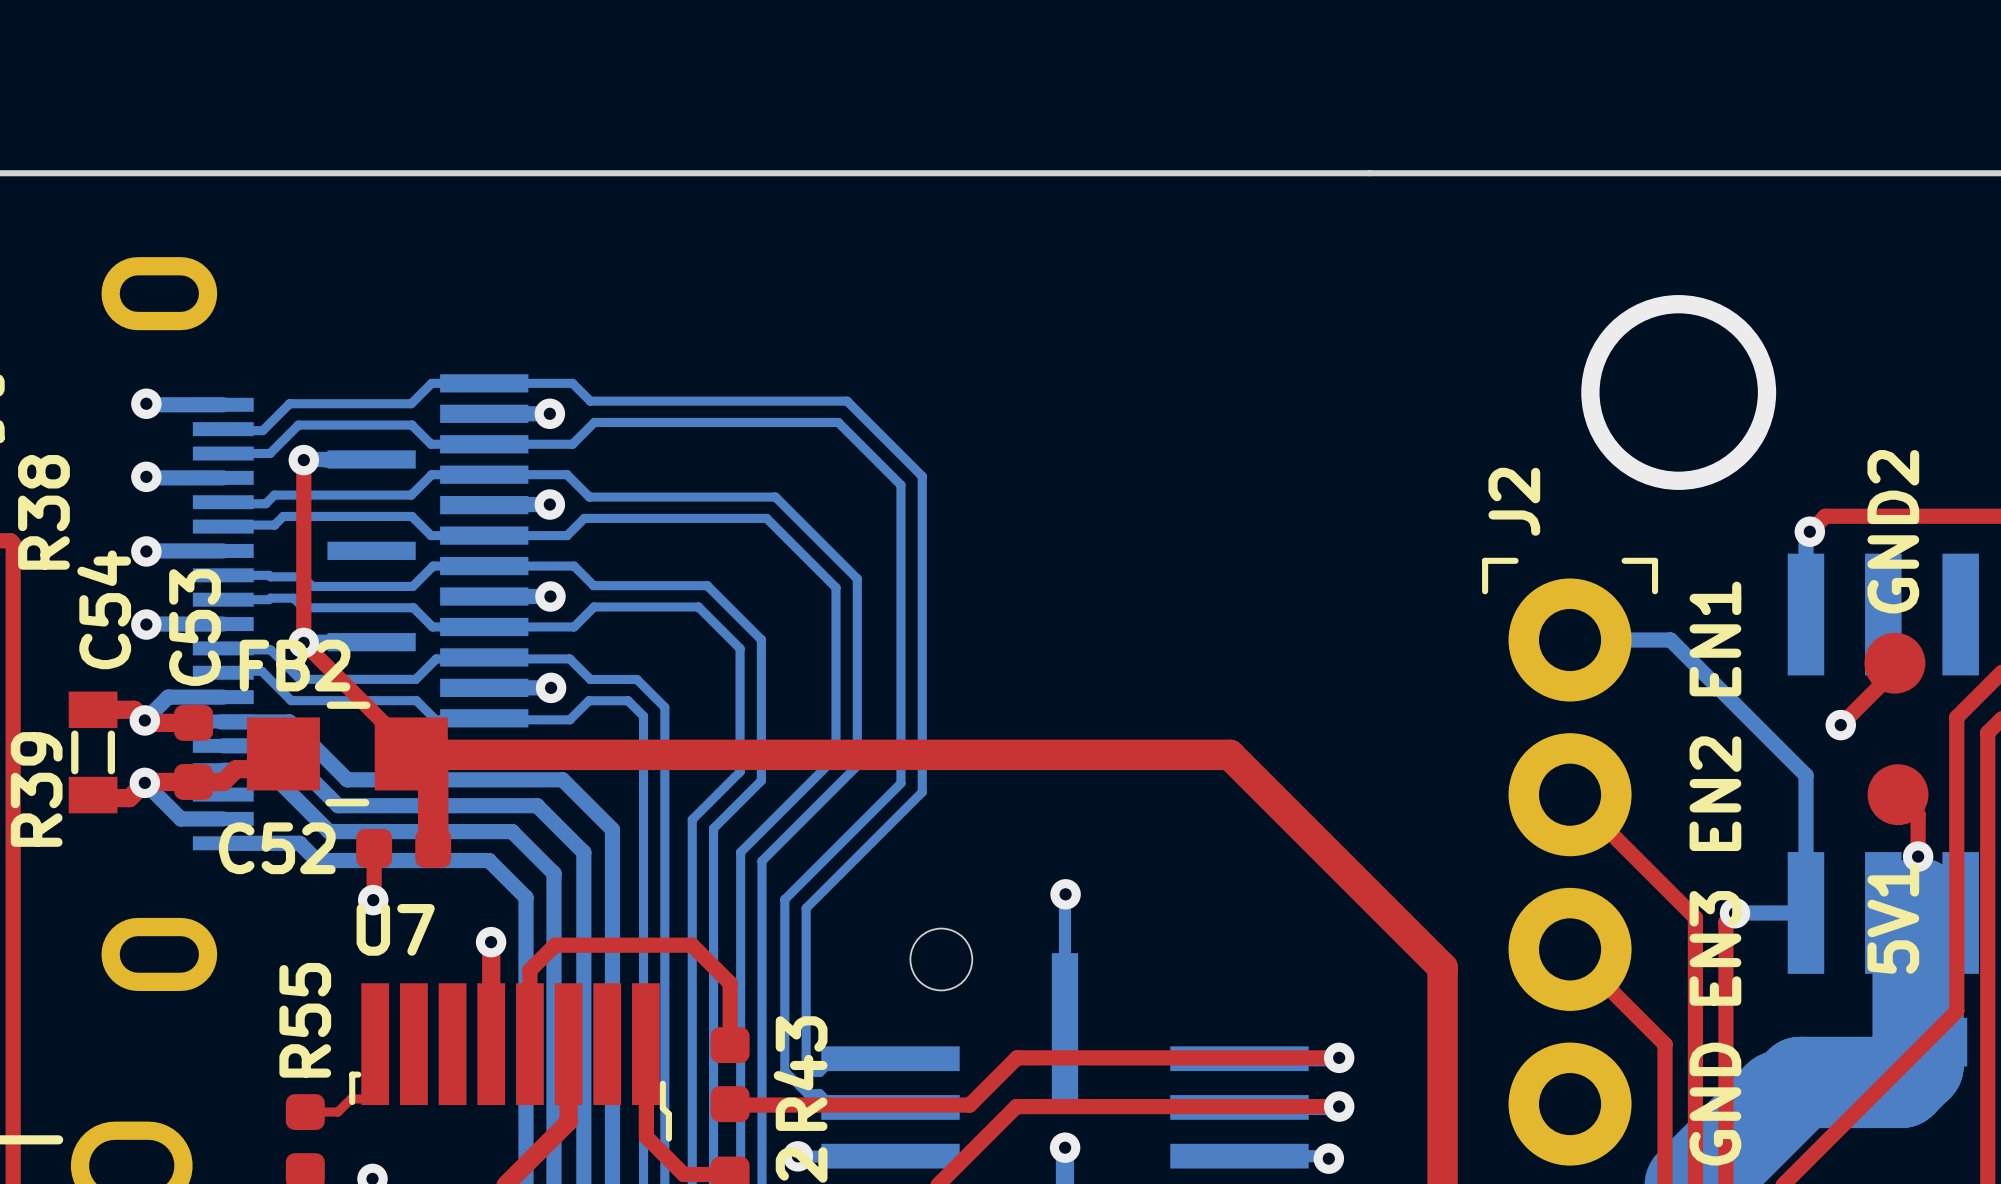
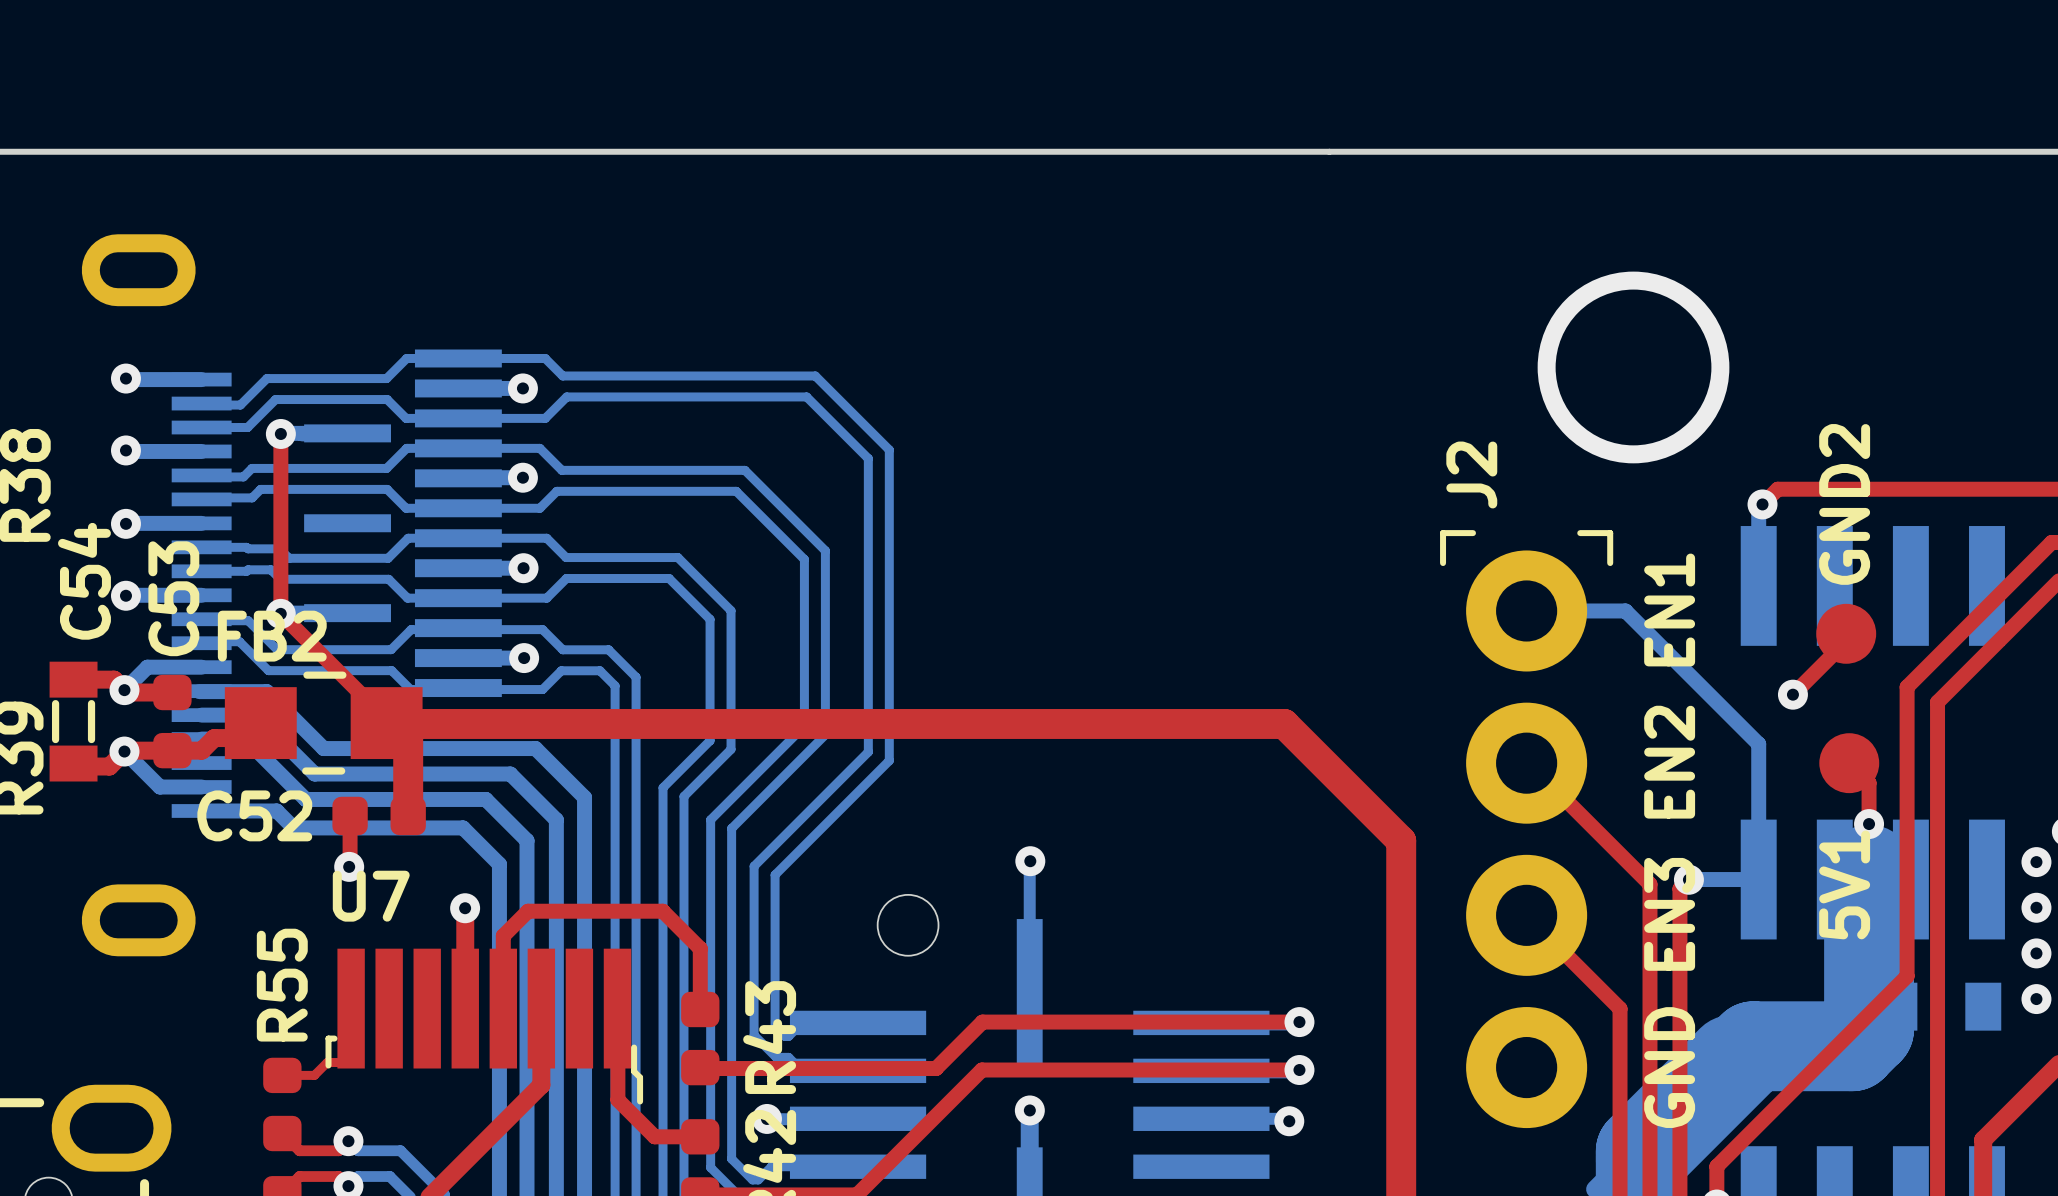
top track: (1229, 754) (1442, 967) -> (1191, 723) (1284, 723) (1401, 840) (1401, 933)

